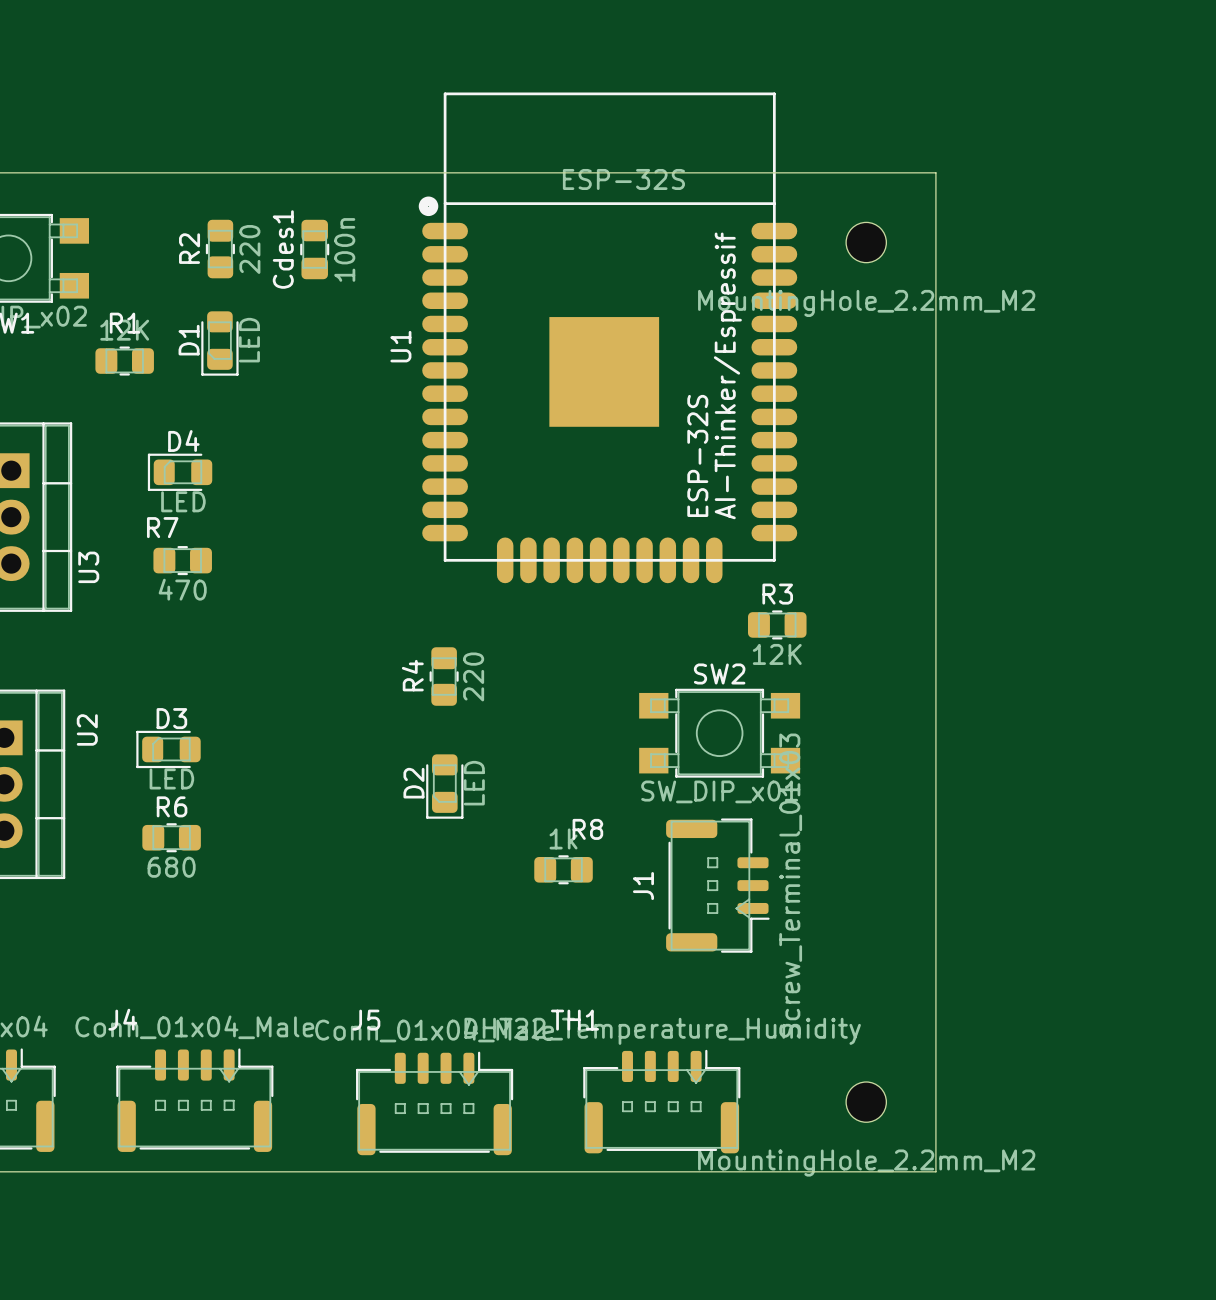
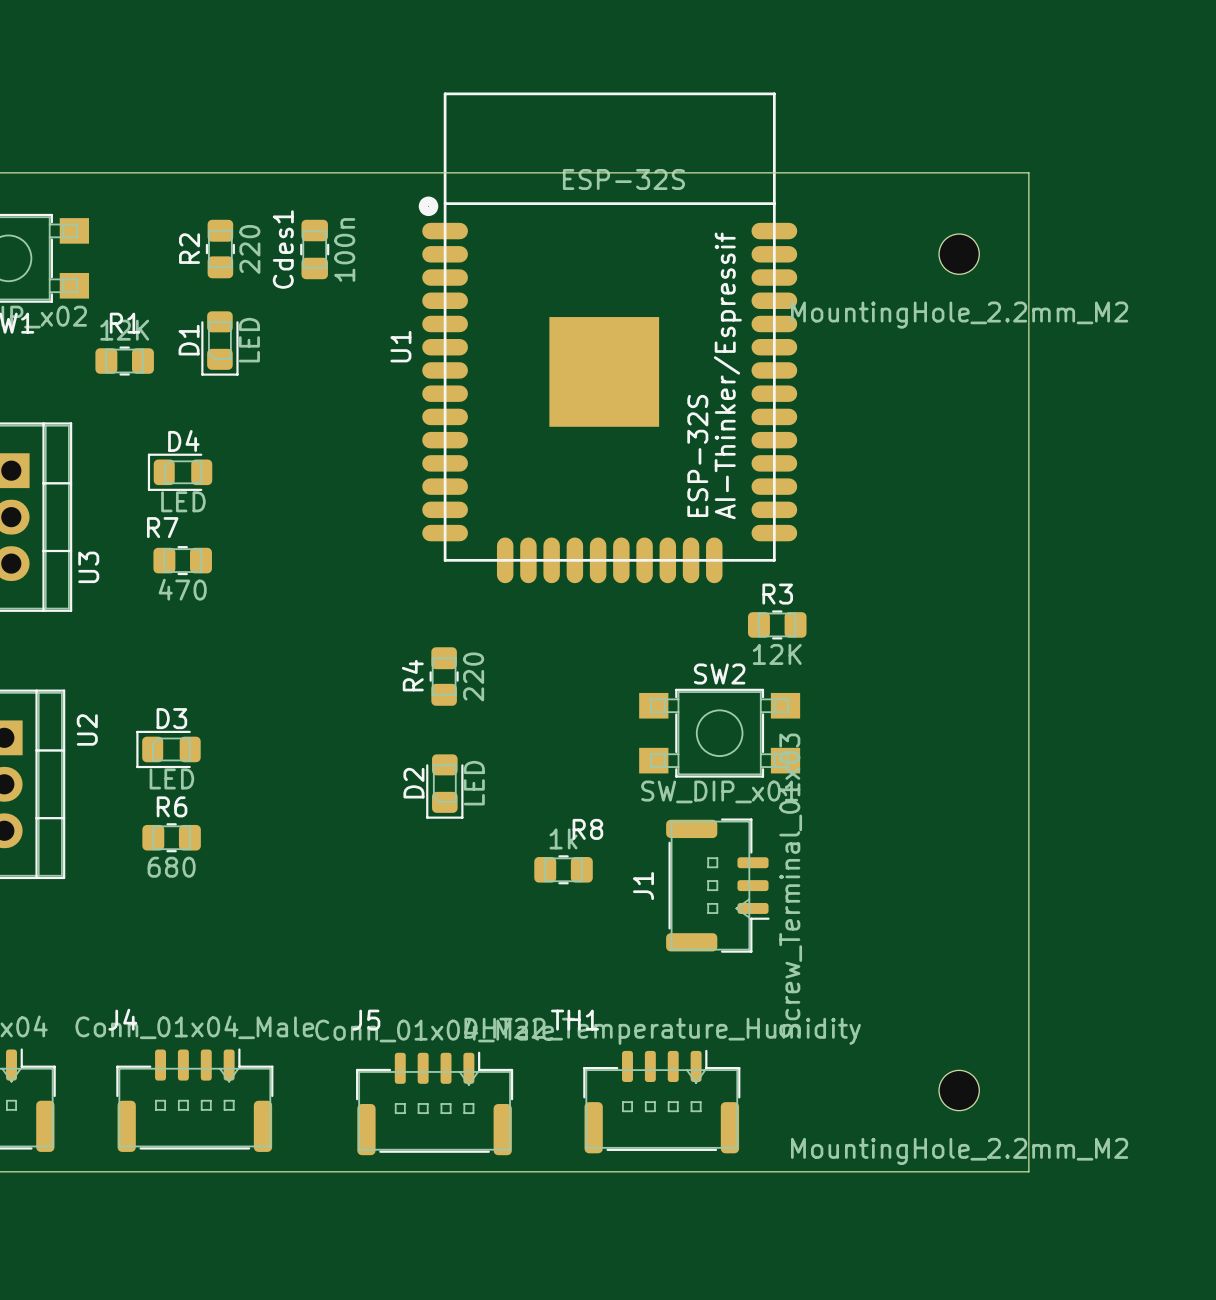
board edge: (935, 172) (935, 1171) -> (935, 172) (1028, 172) (1028, 1171) (935, 1171)
part position: (866, 242) -> (959, 254)
part position: (866, 1102) -> (959, 1090)

